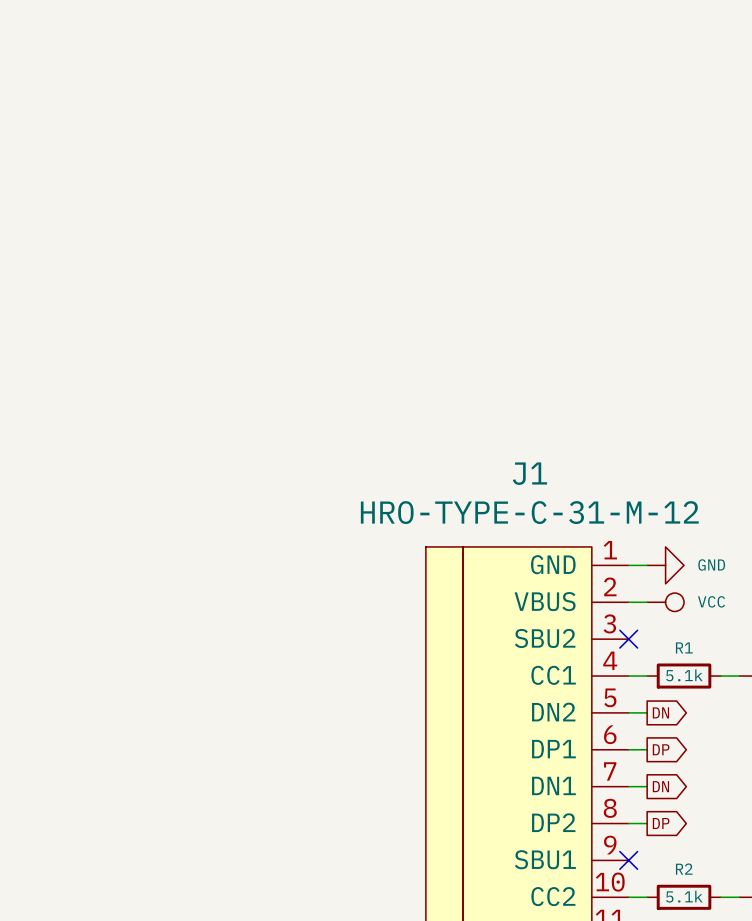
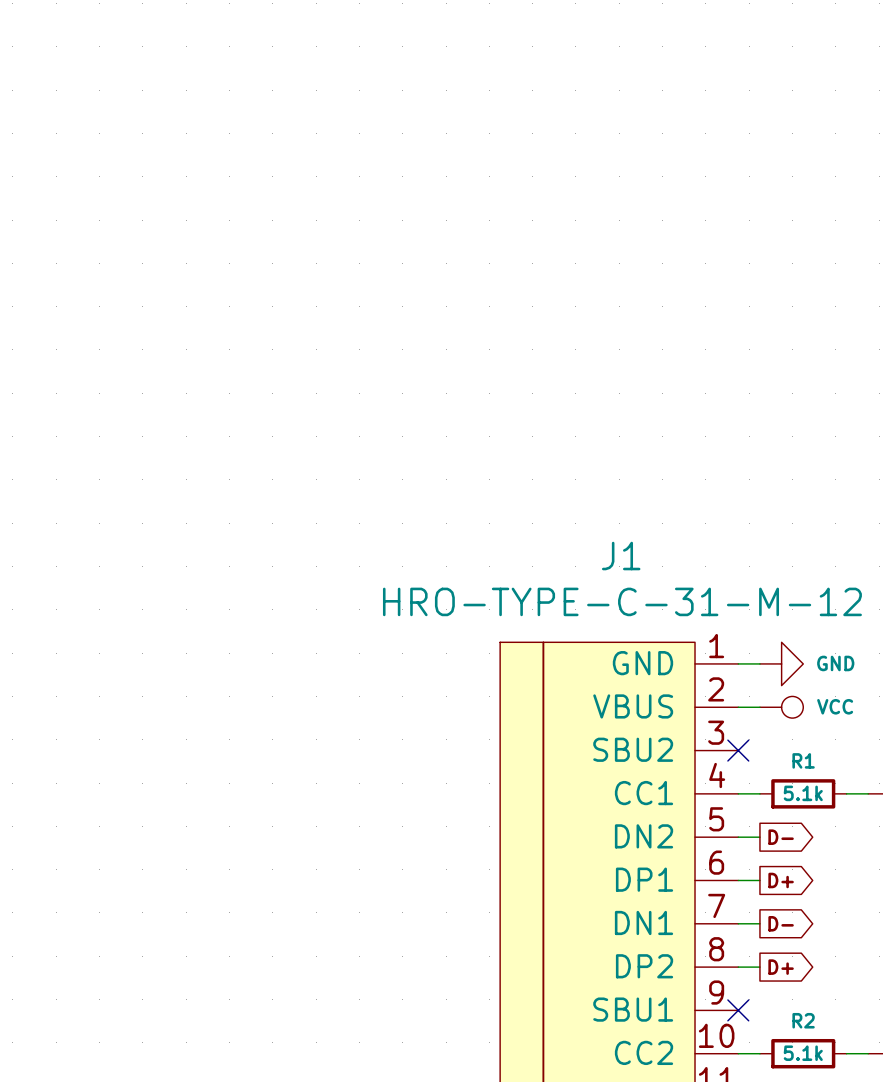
global label: DN (660, 712) -> D- (781, 837)
global label: DP (661, 749) -> D+ (781, 880)
global label: DN (660, 786) -> D- (781, 923)
global label: DP (661, 823) -> D+ (781, 967)

